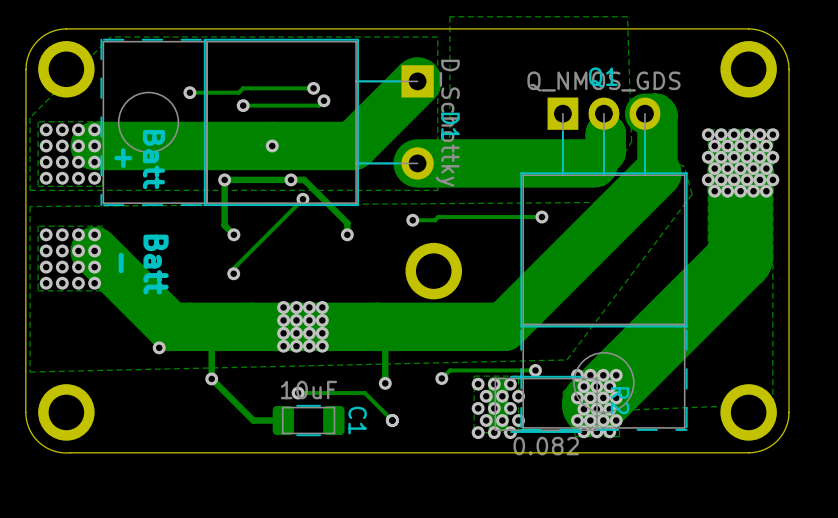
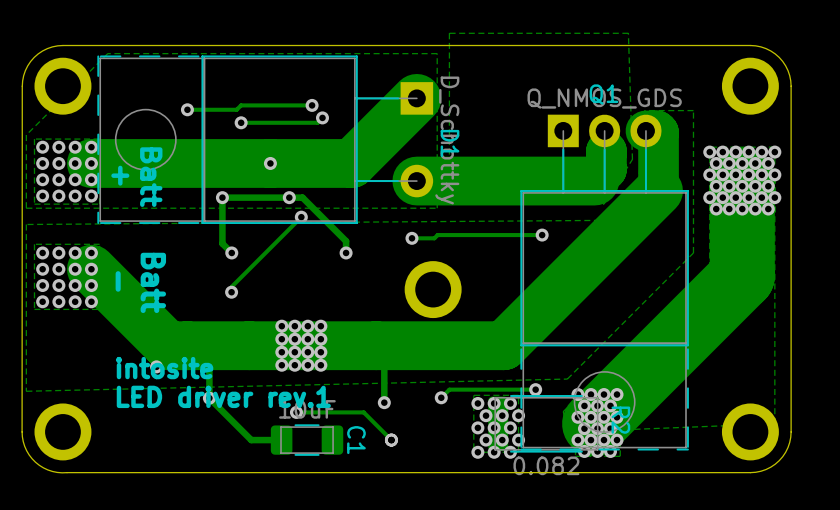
zone outline: (635, 186) (643, 154) (684, 166) (692, 194) (566, 359) -> (636, 204) (644, 110) (693, 110) (693, 252) (567, 379)
text: none -> intosite (164, 368)
text: none -> LED driver rev.1 (223, 396)

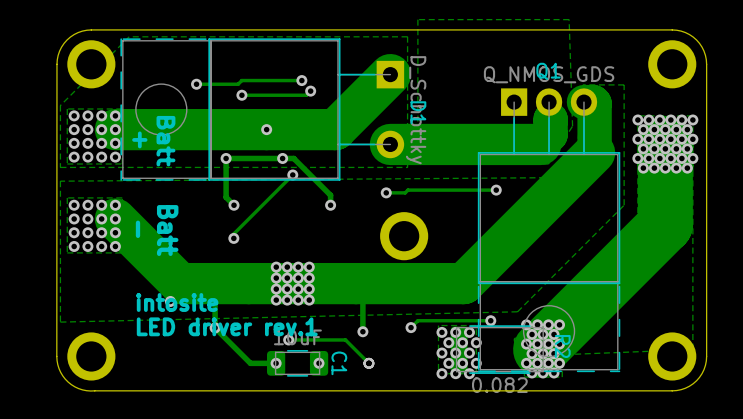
via: none -> (318, 363)
via: none -> (276, 363)

